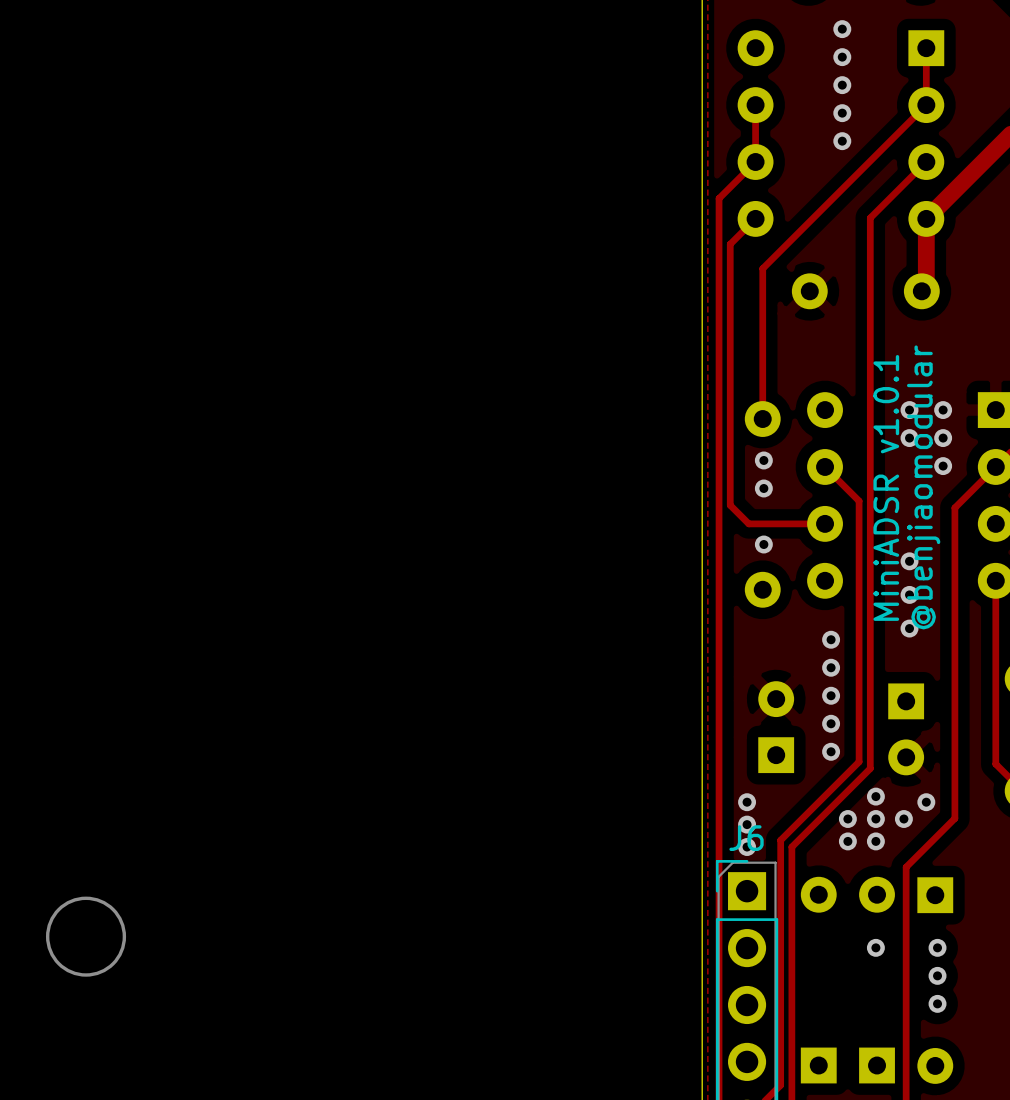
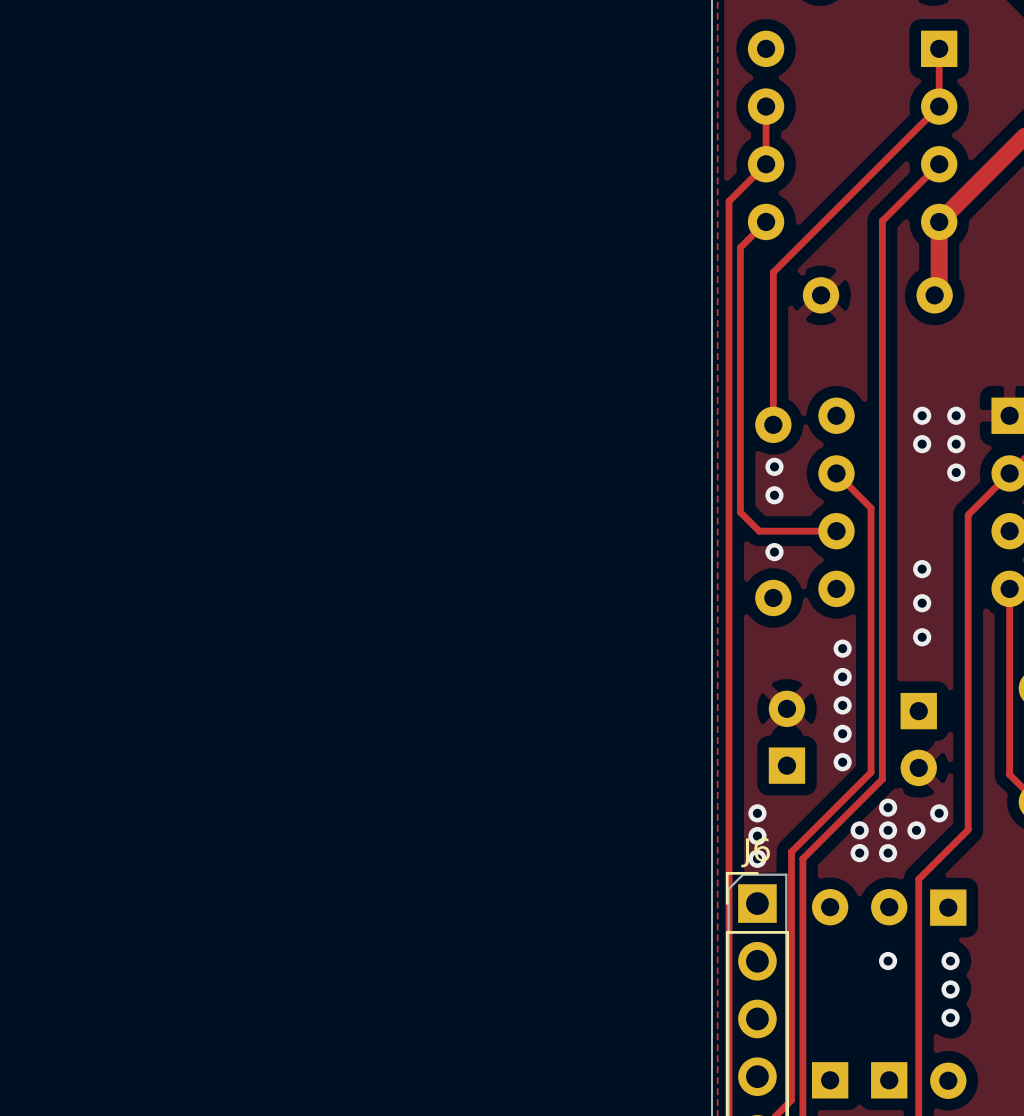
via: (842, 29) -> none
via: (842, 57) -> none
via: (842, 85) -> none
via: (842, 113) -> none
via: (842, 141) -> none
text: MiniADSR v1.0.1 (886, 487) -> none
text: @benjiaomodular (923, 487) -> none
drawing: [45, 896, 127, 977] -> none

